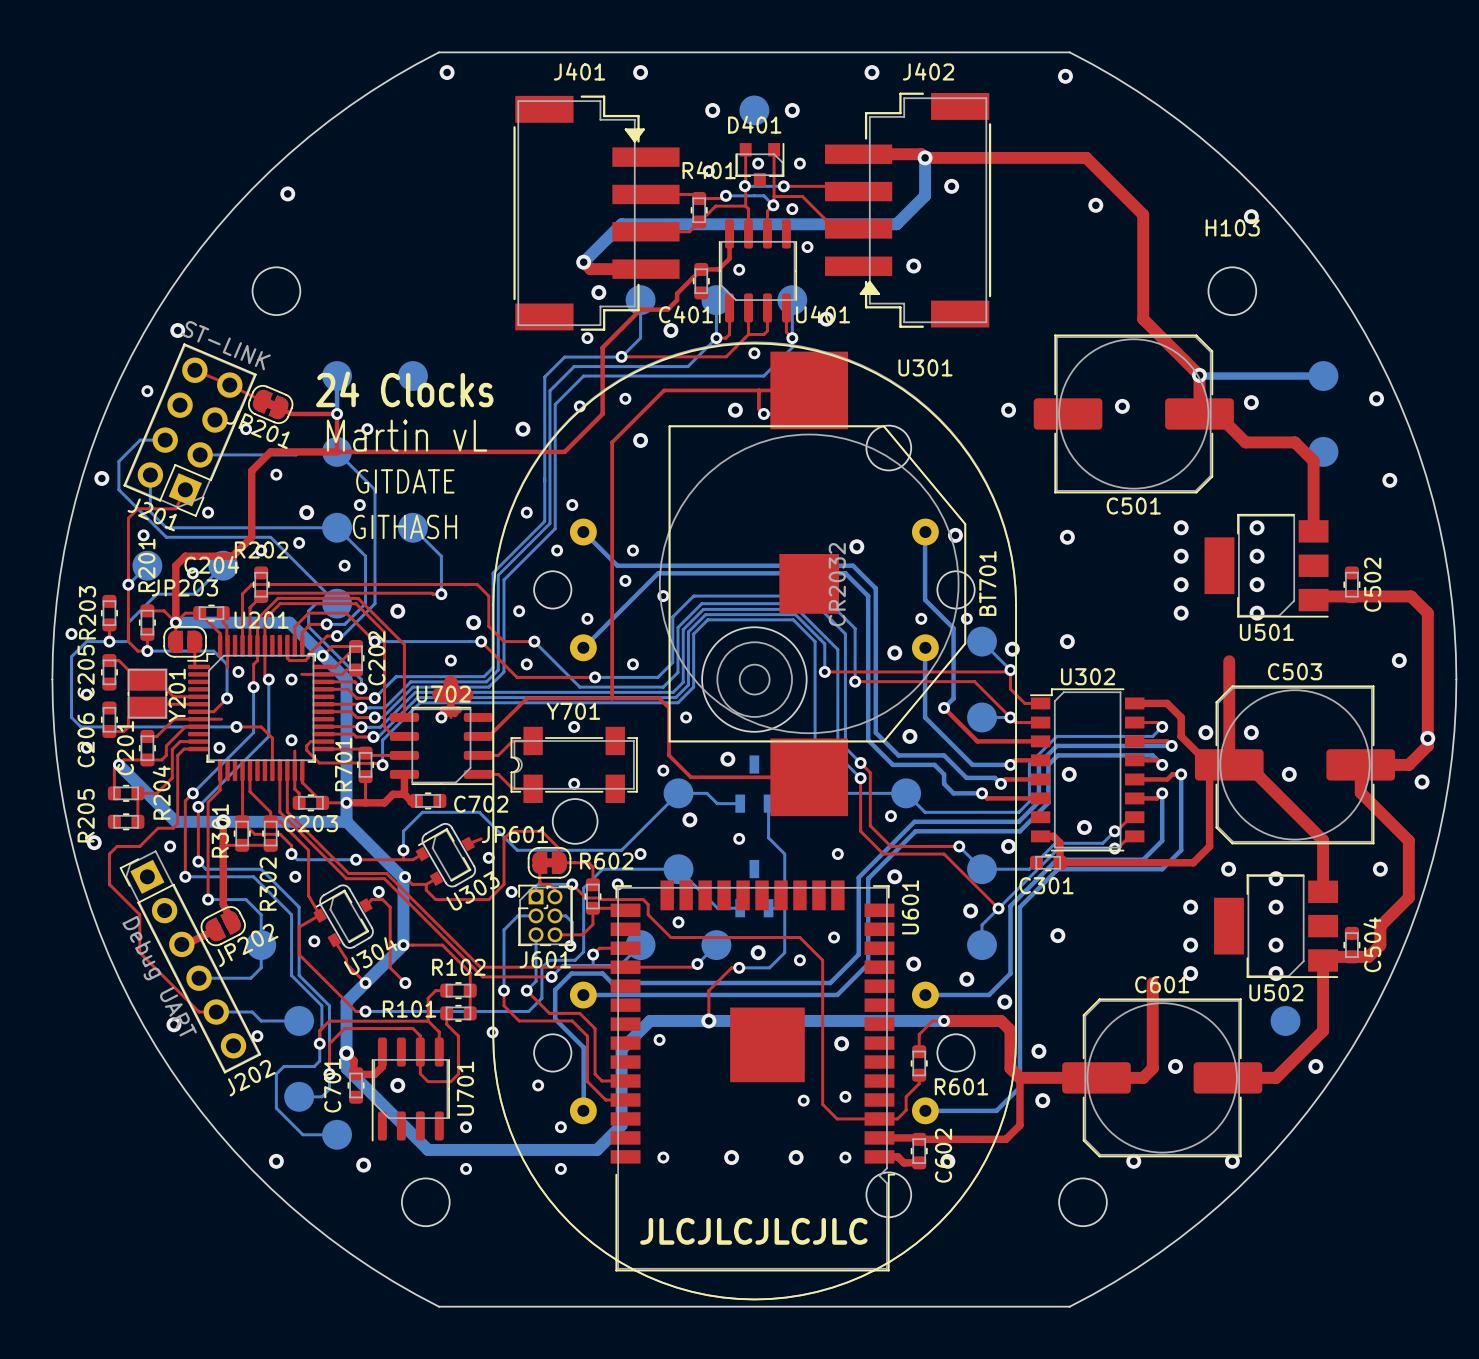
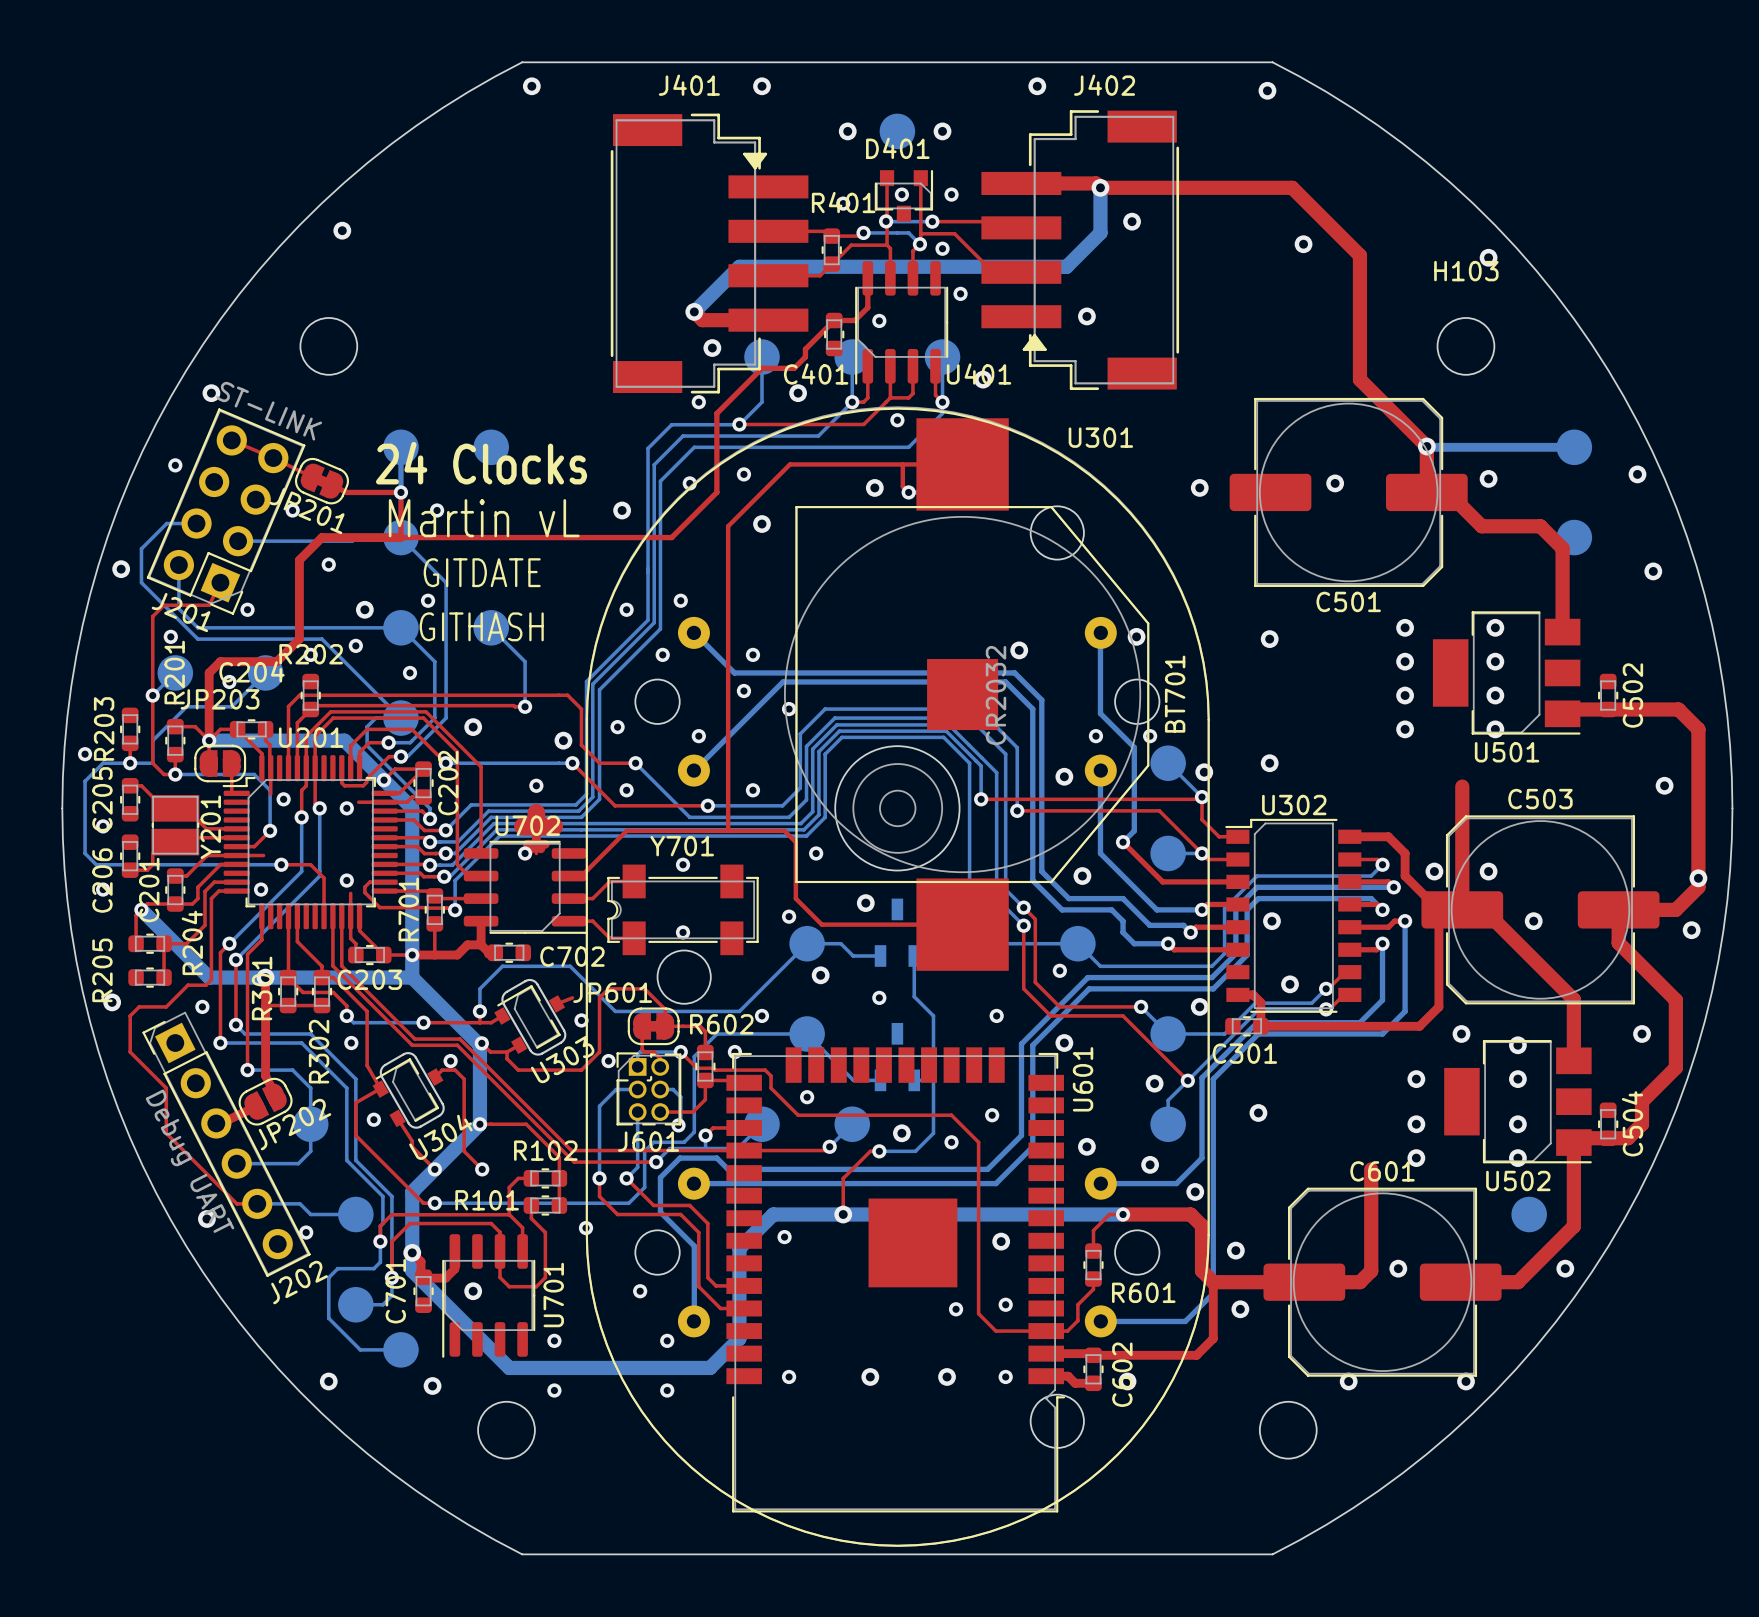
text: JLCJLCJLCJLC (753, 1231) -> none

